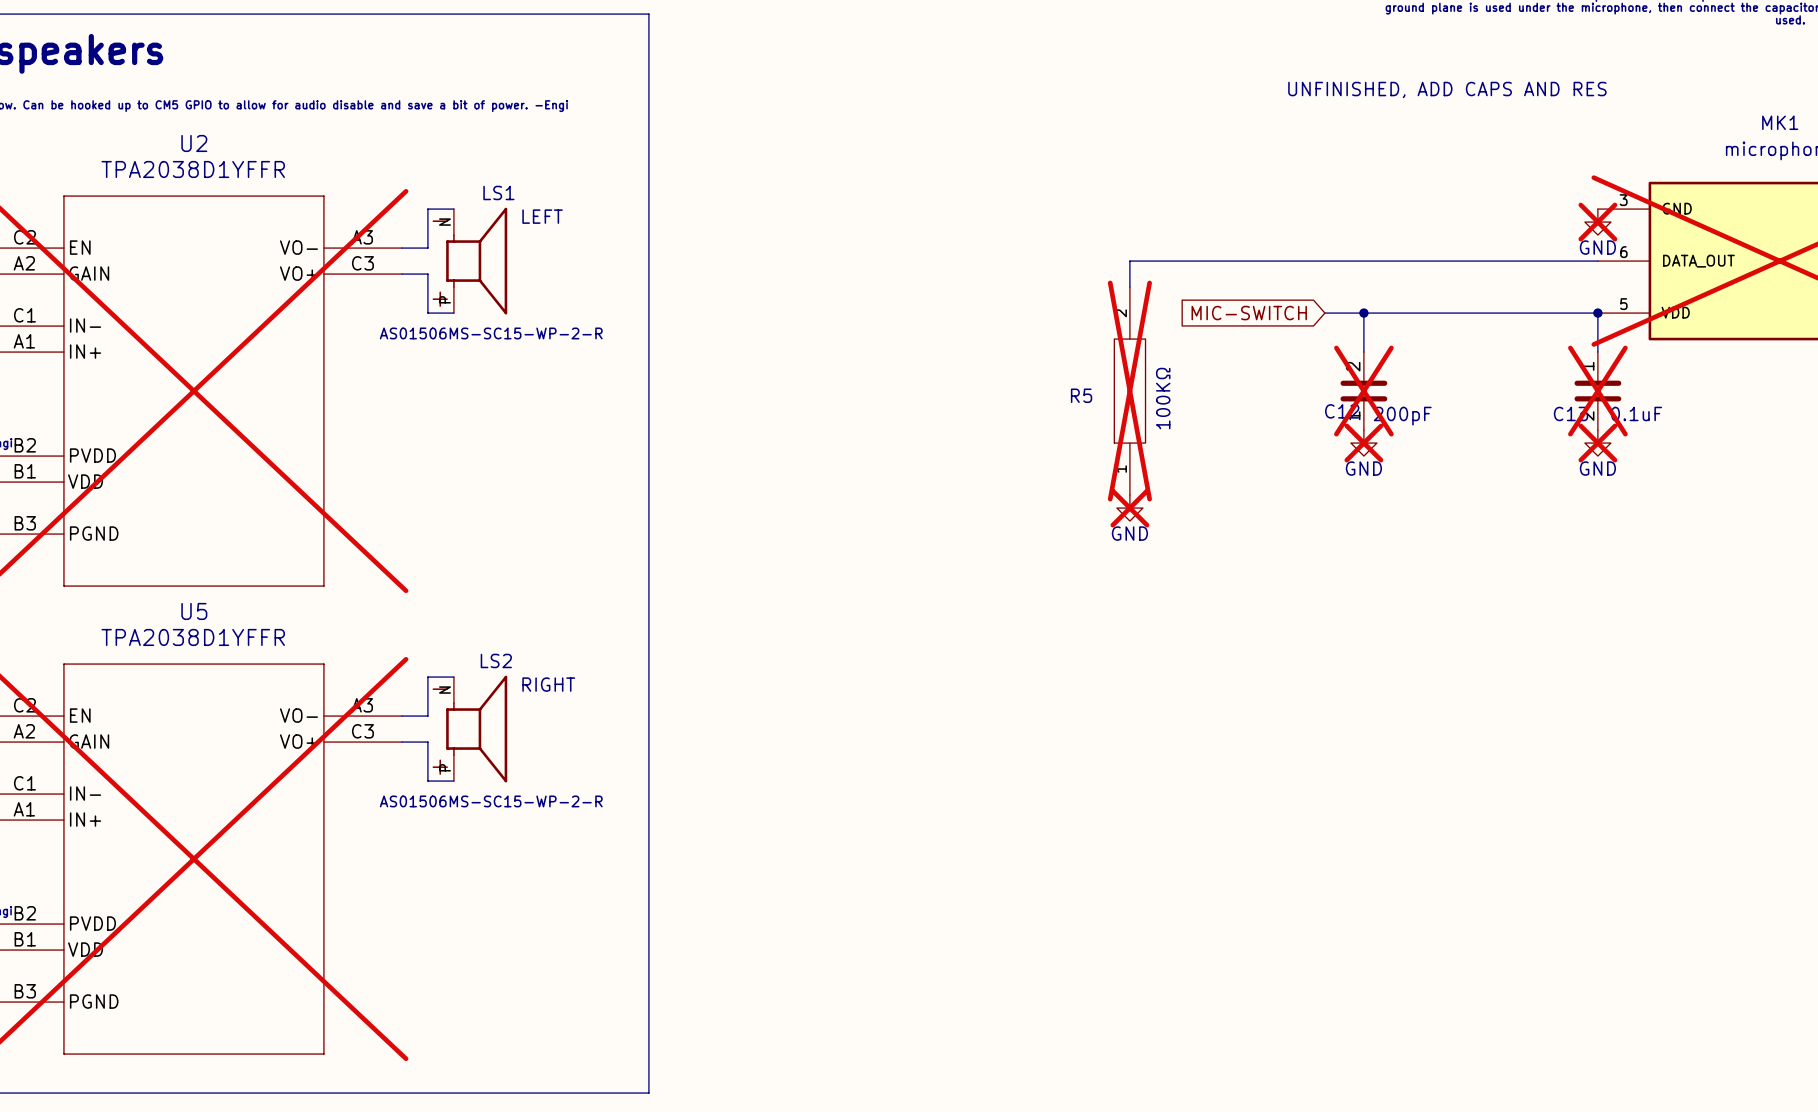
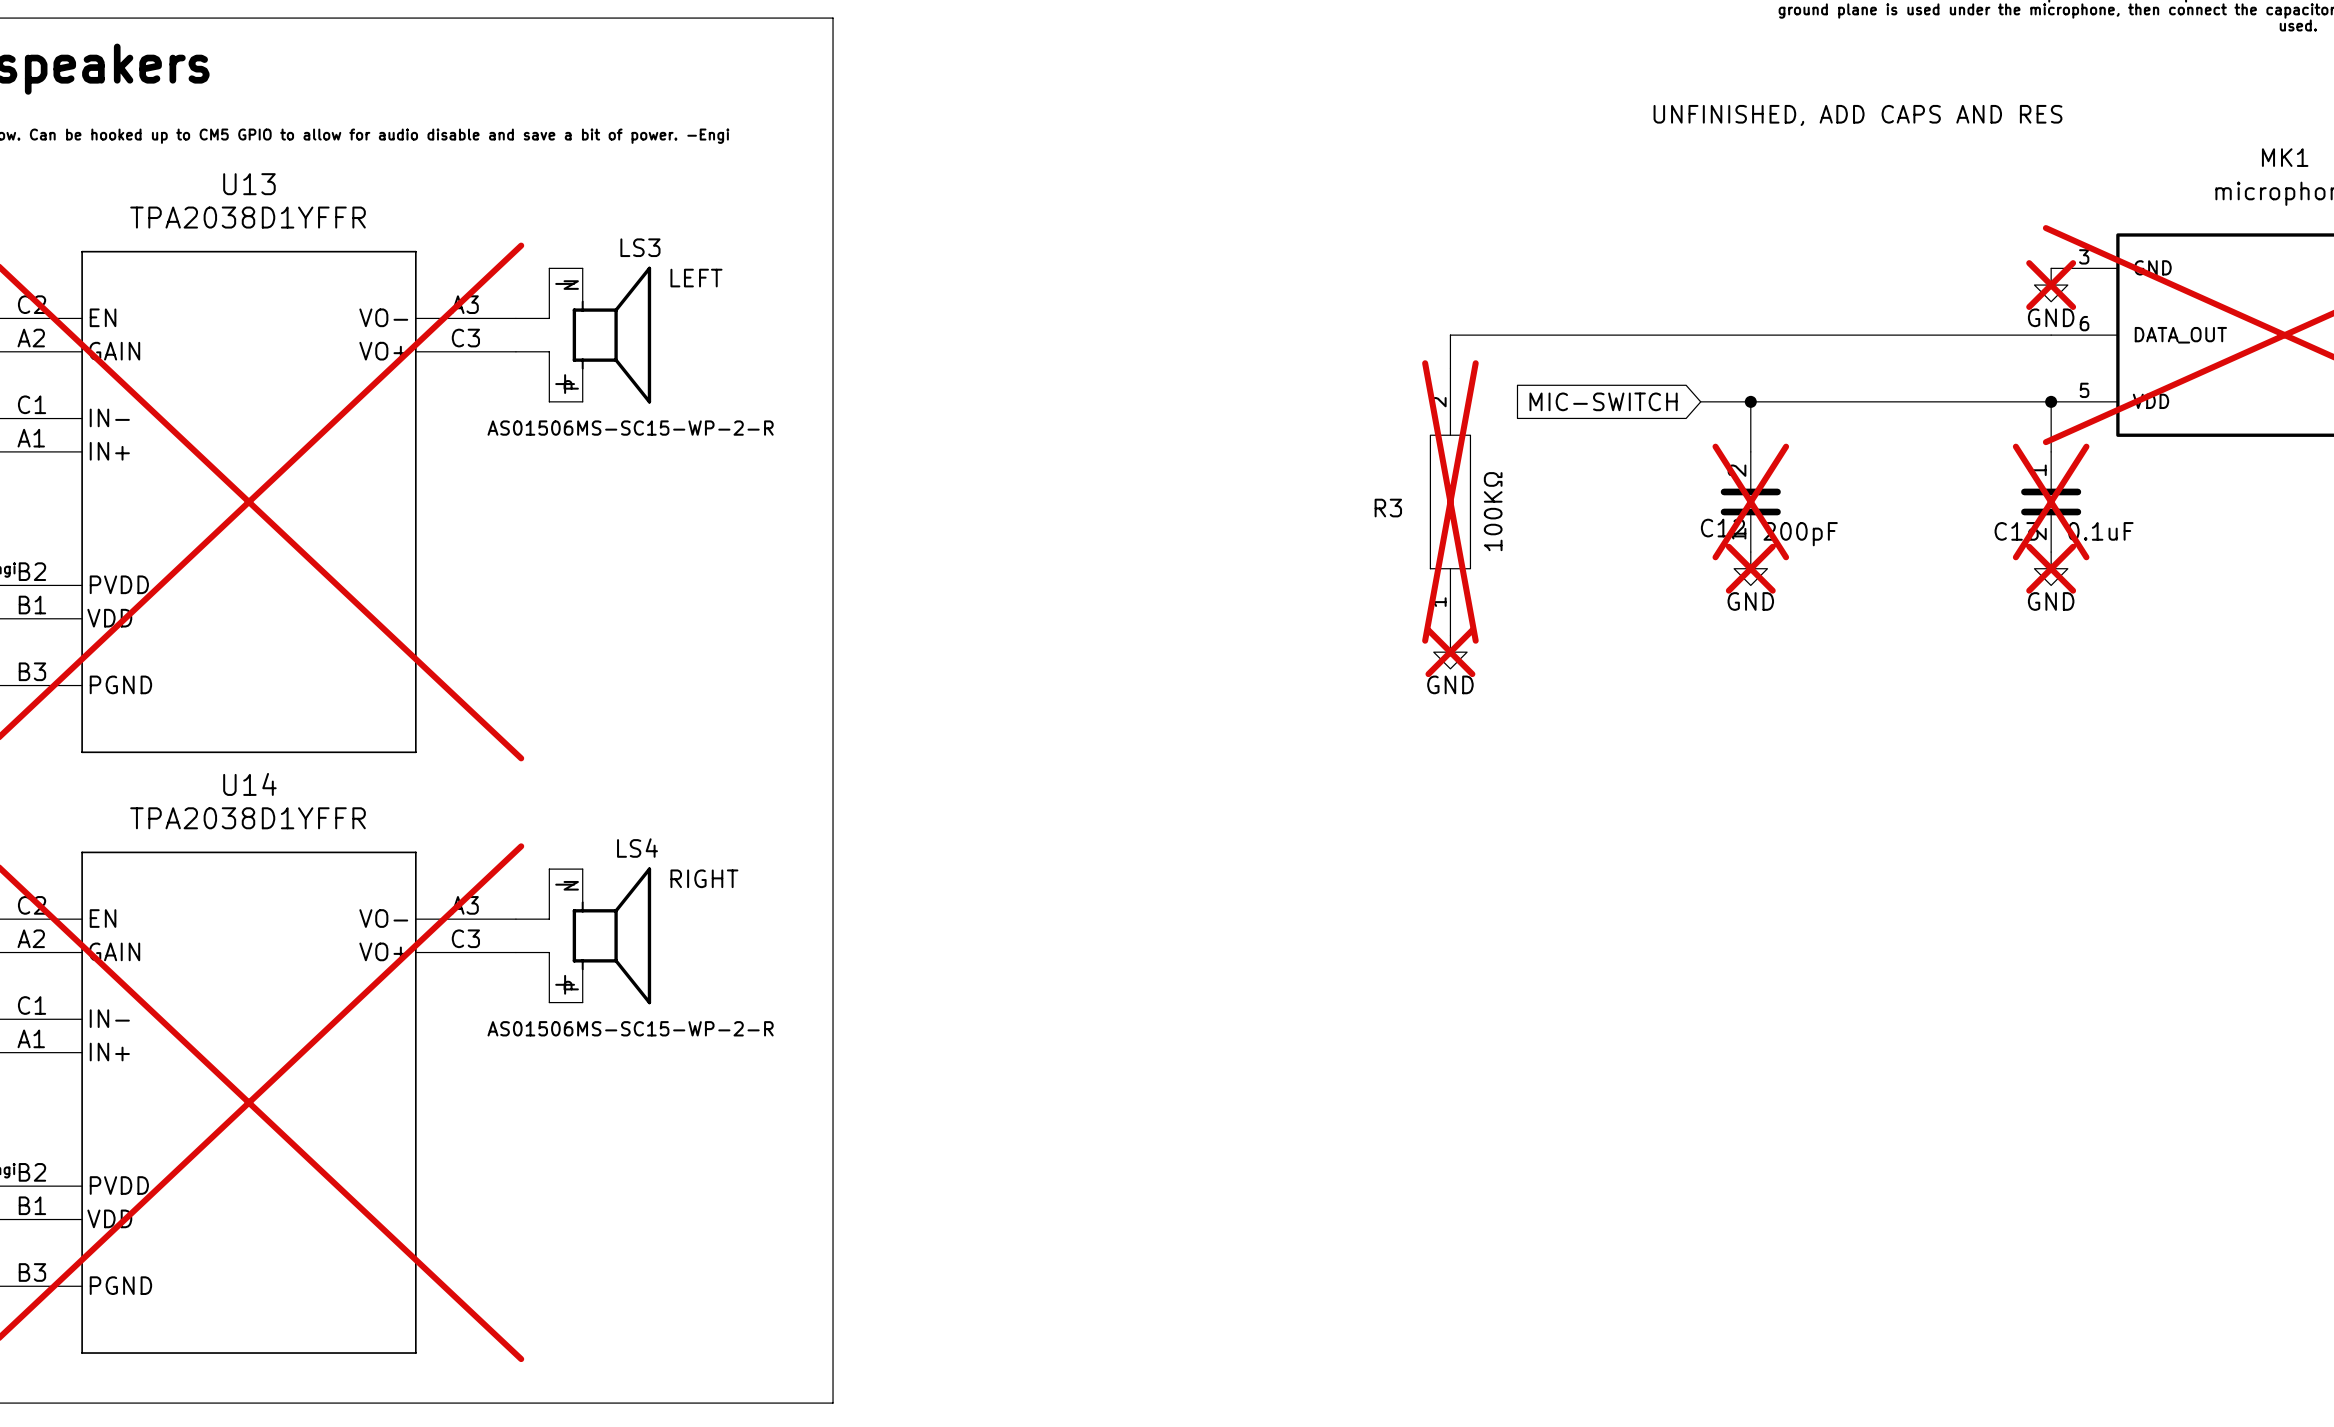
U2 name: U2 (194, 143) -> U13 (249, 184)
LS1 name: LS1 (498, 192) -> LS3 (640, 247)
R5 name: R5 (1081, 395) -> R3 (1388, 508)
U5 name: U5 (194, 611) -> U14 (249, 784)
LS2 name: LS2 (496, 660) -> LS4 (637, 848)

